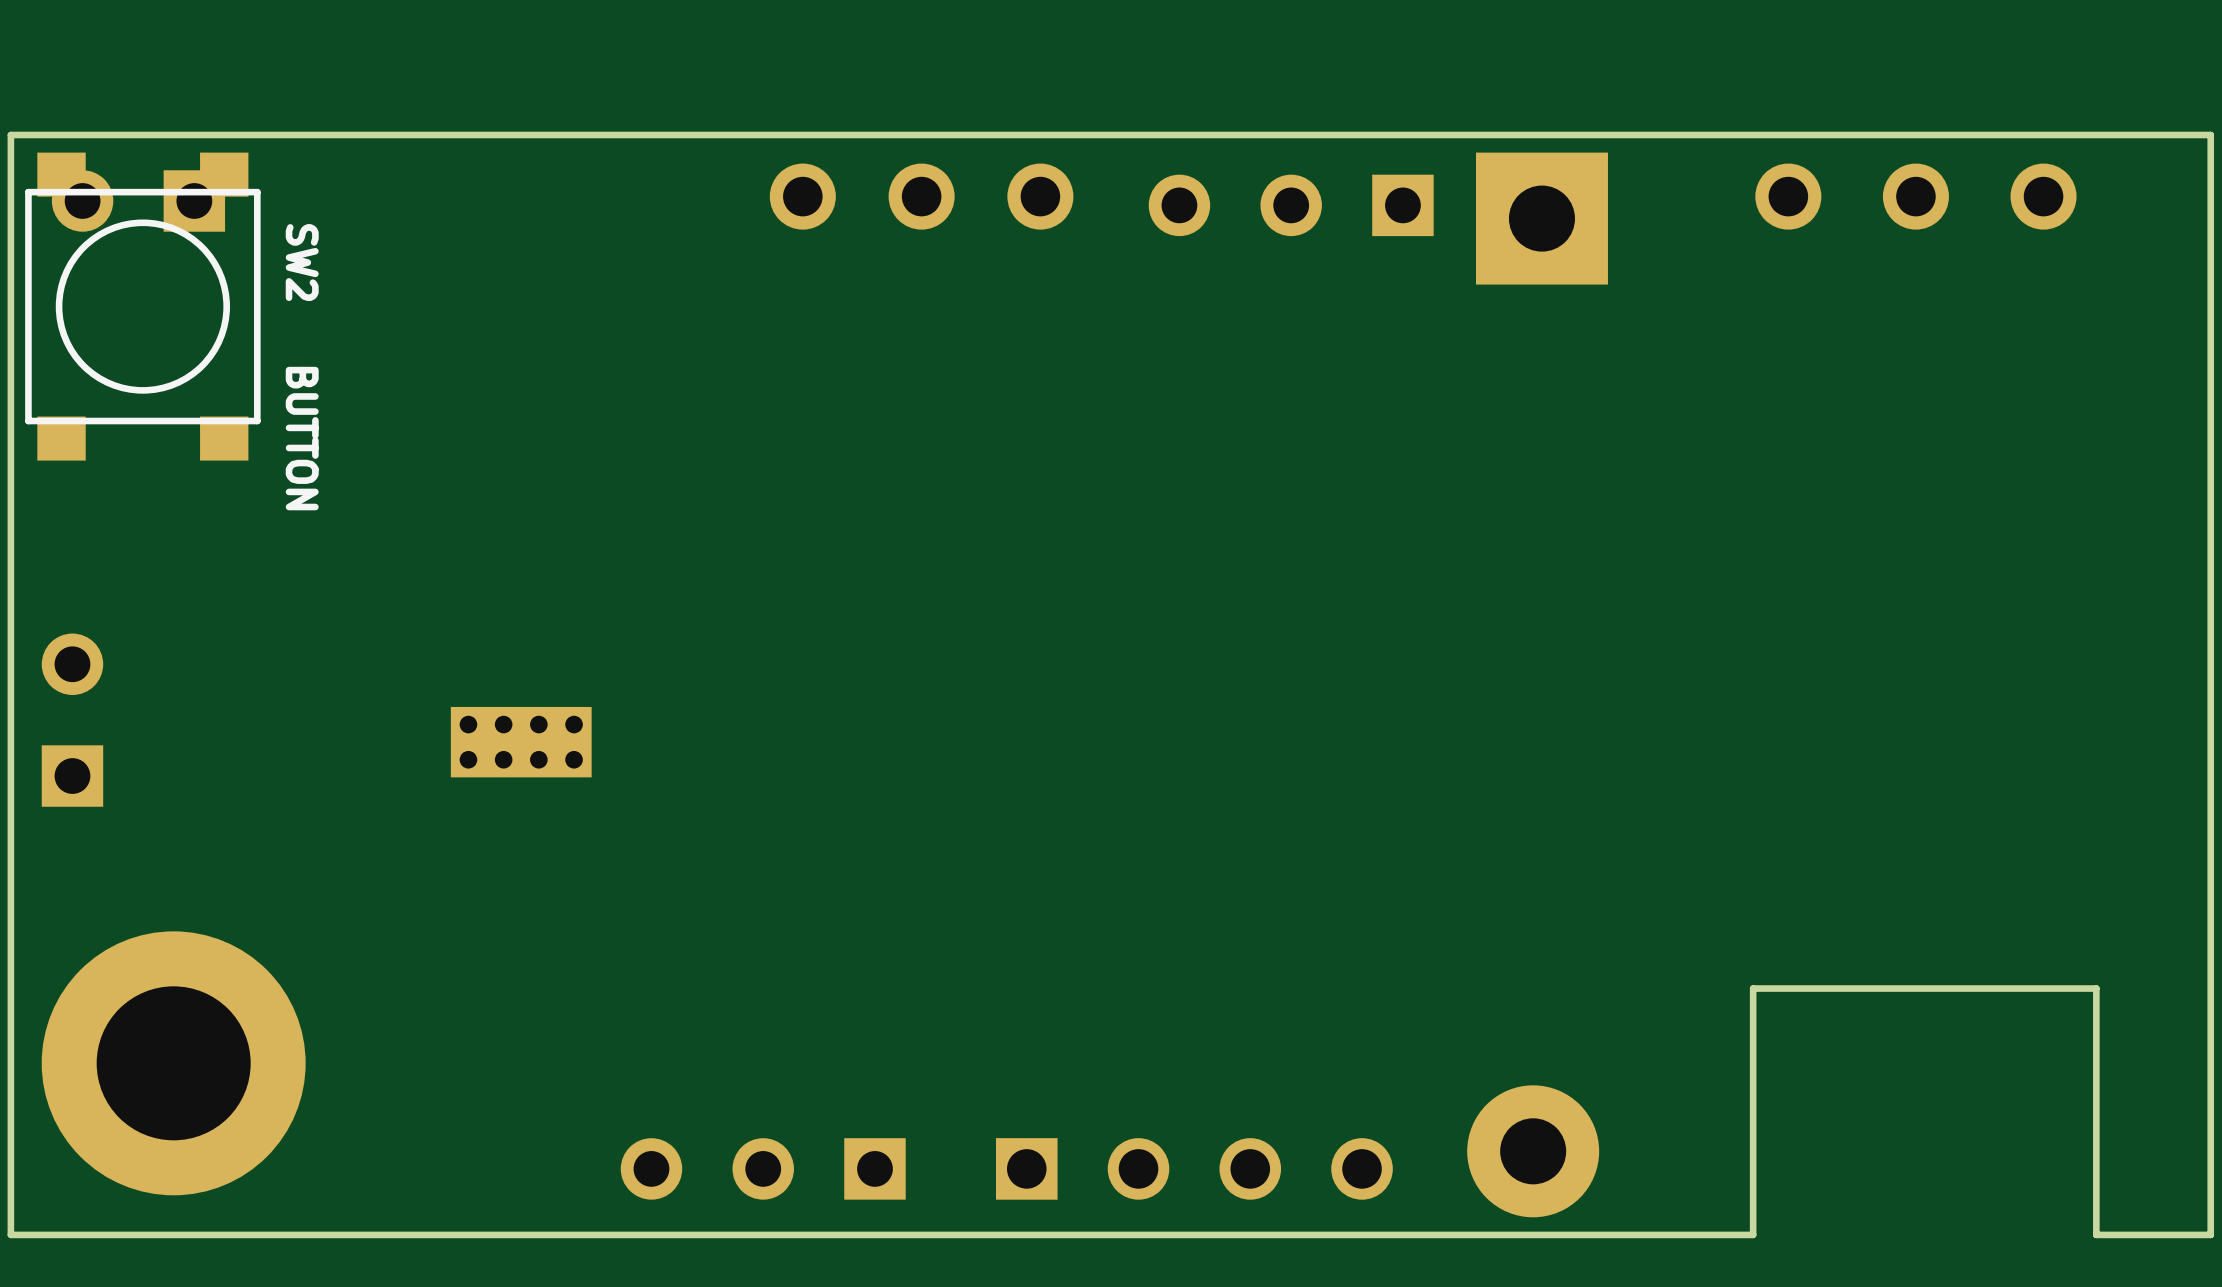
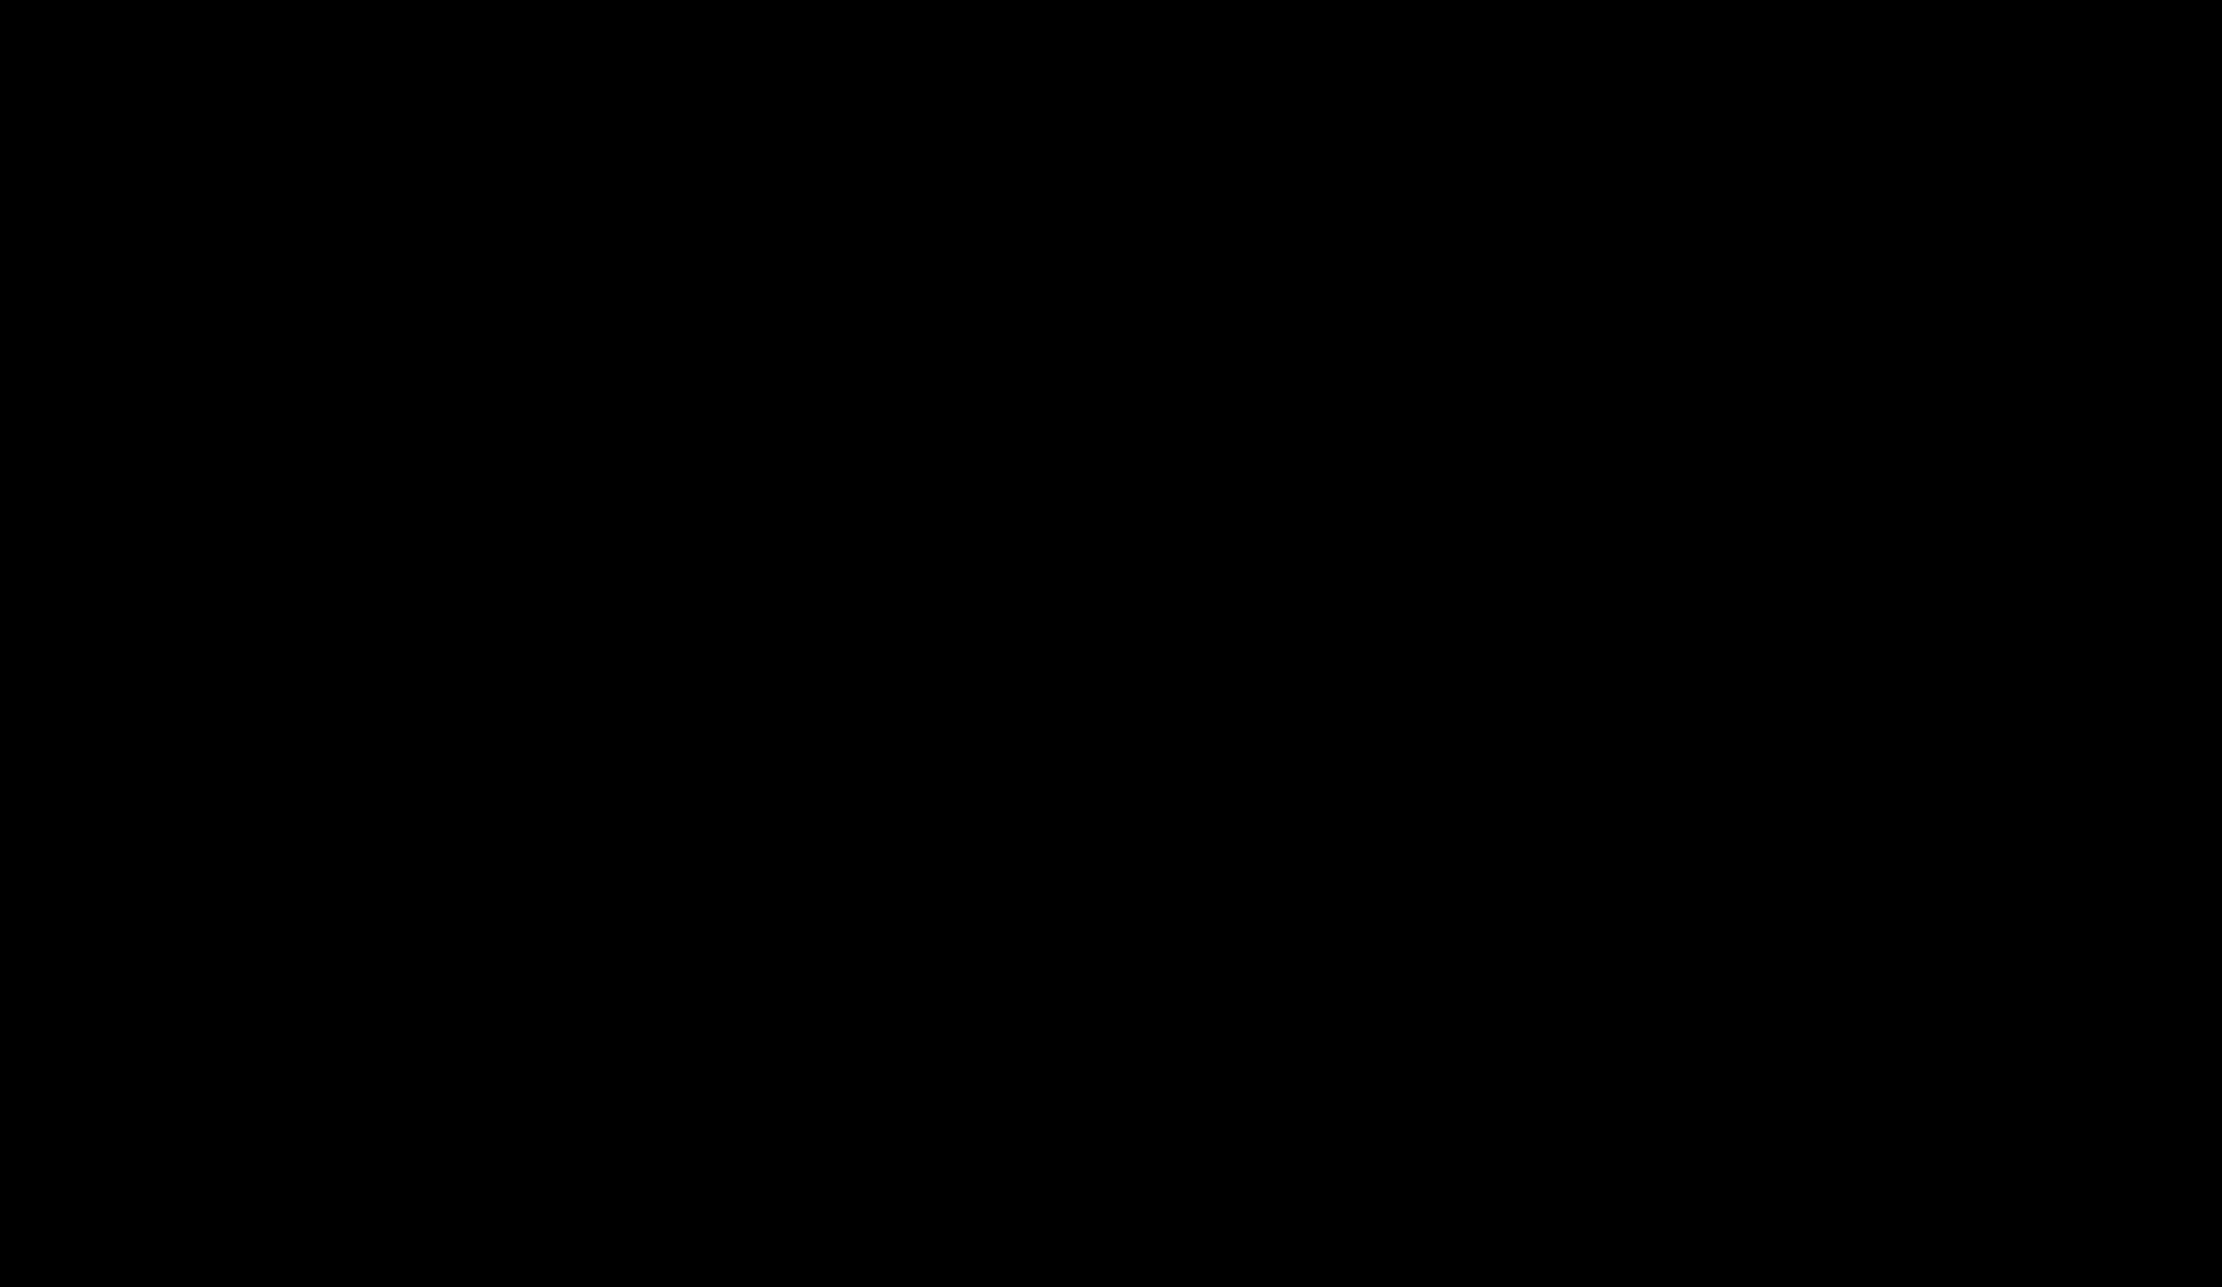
board edge: (2210, 134) (2210, 1234) (2096, 1234) (2096, 988) (1753, 988) (1753, 1234) (10, 1234) (10, 134) (2210, 134) -> none
part: (802, 196) -> none
part: (921, 196) -> none
part: (1040, 196) -> none
part: (1788, 196) -> none
part: (1915, 196) -> none
part: (2043, 196) -> none
part: (138, 200) -> none
part: (1291, 205) -> none
part: (1541, 218) -> none
SW2: BUTTON (142, 306) -> none
part: (72, 720) -> none
part: (521, 742) -> none
part: (173, 1063) -> none
part: (1533, 1151) -> none
part: (763, 1168) -> none
part: (1194, 1168) -> none

